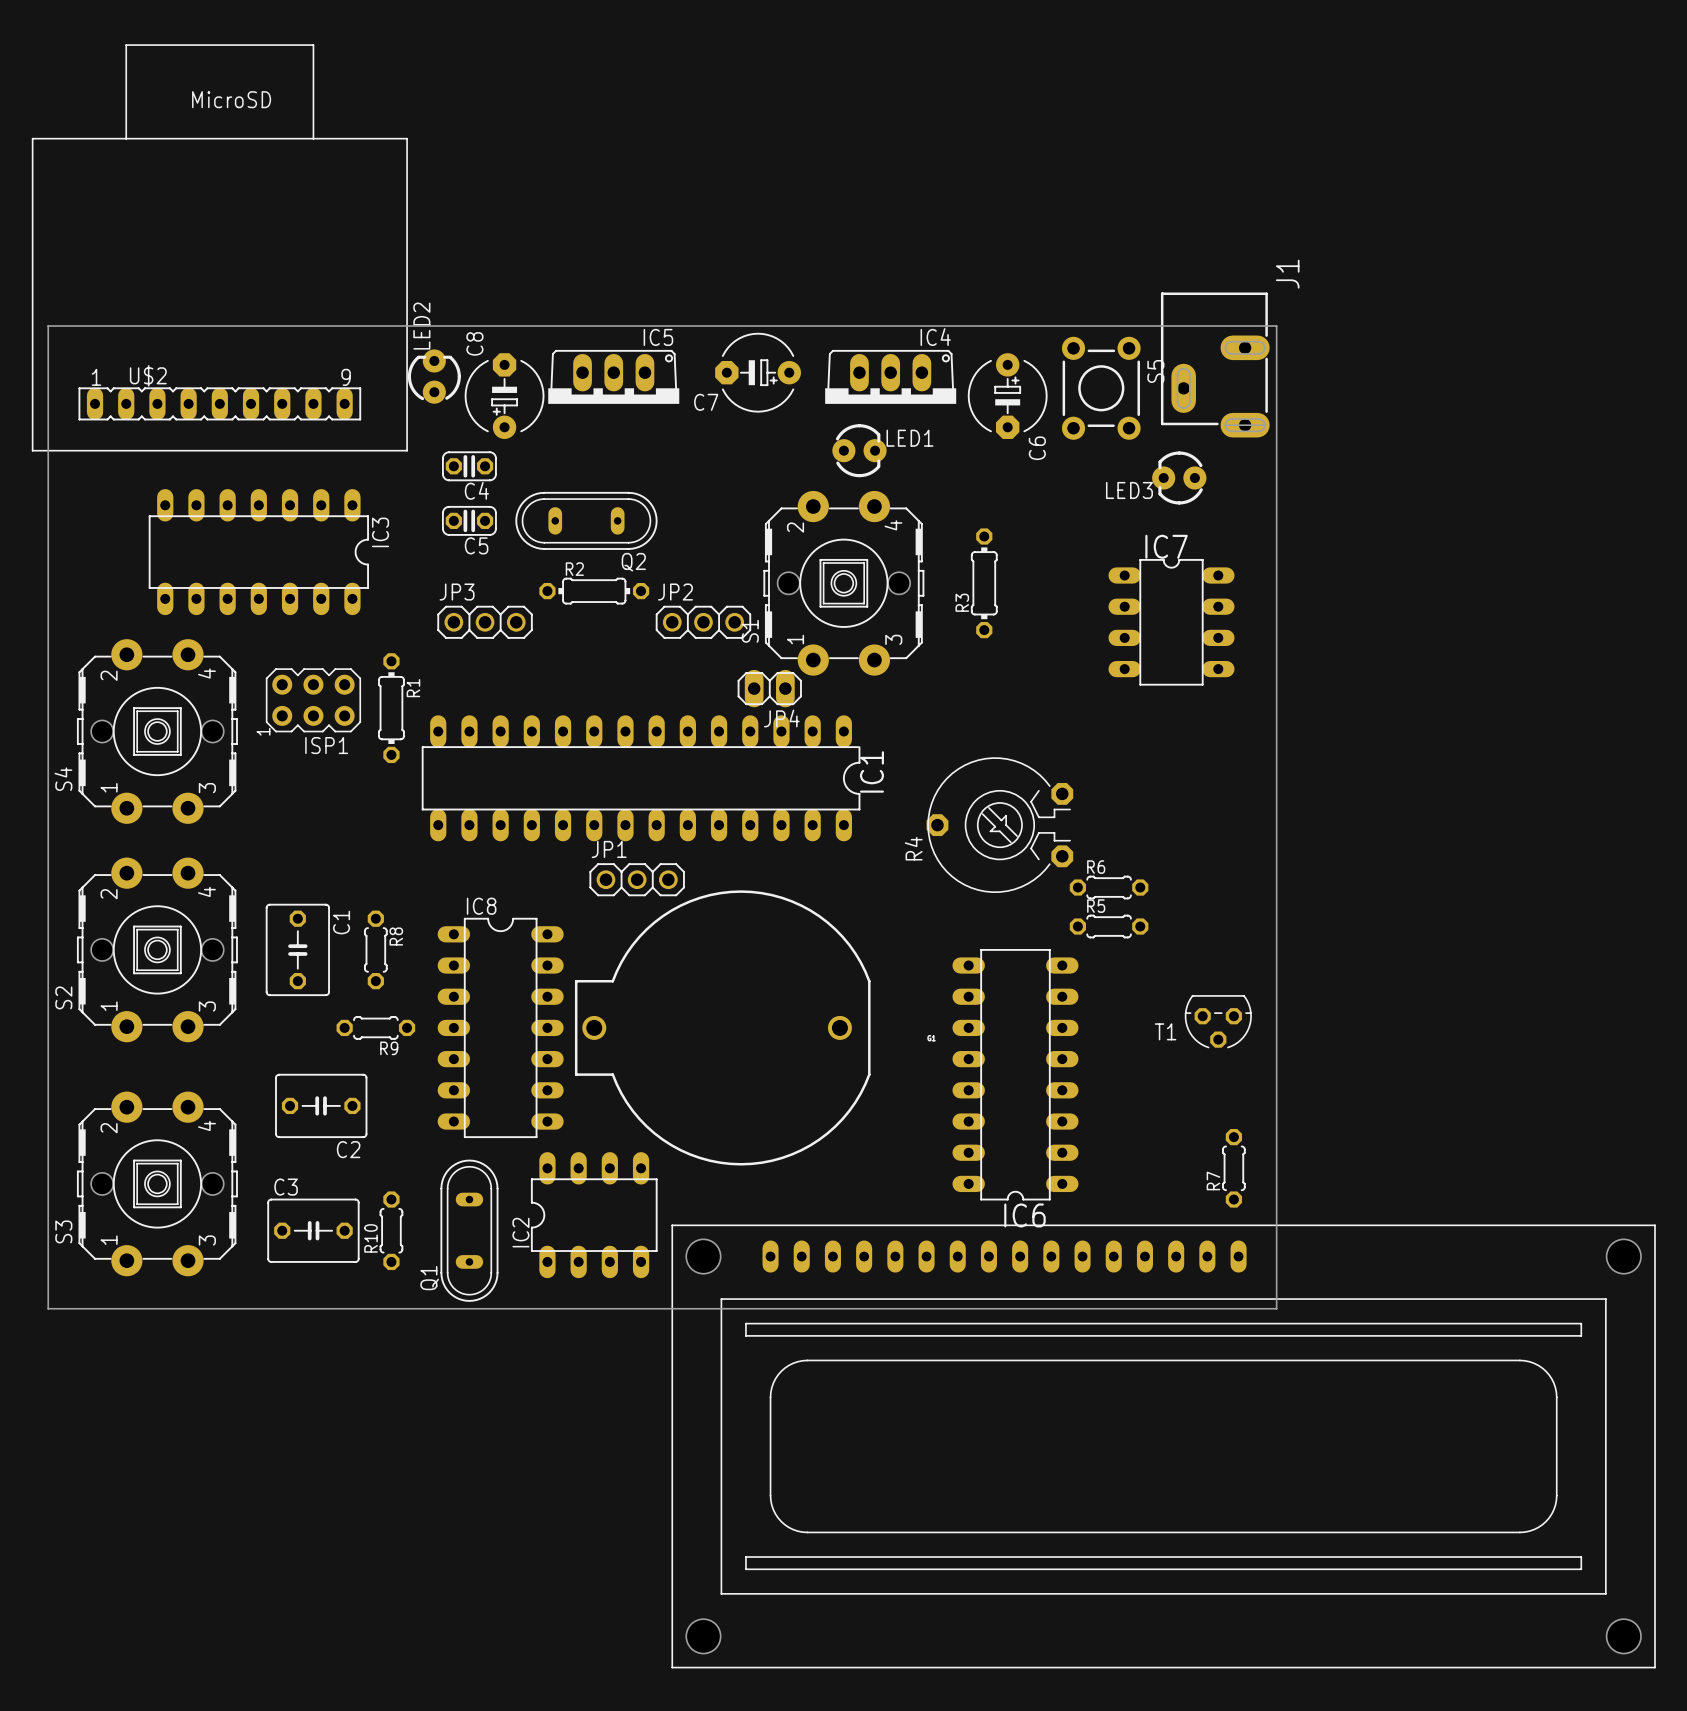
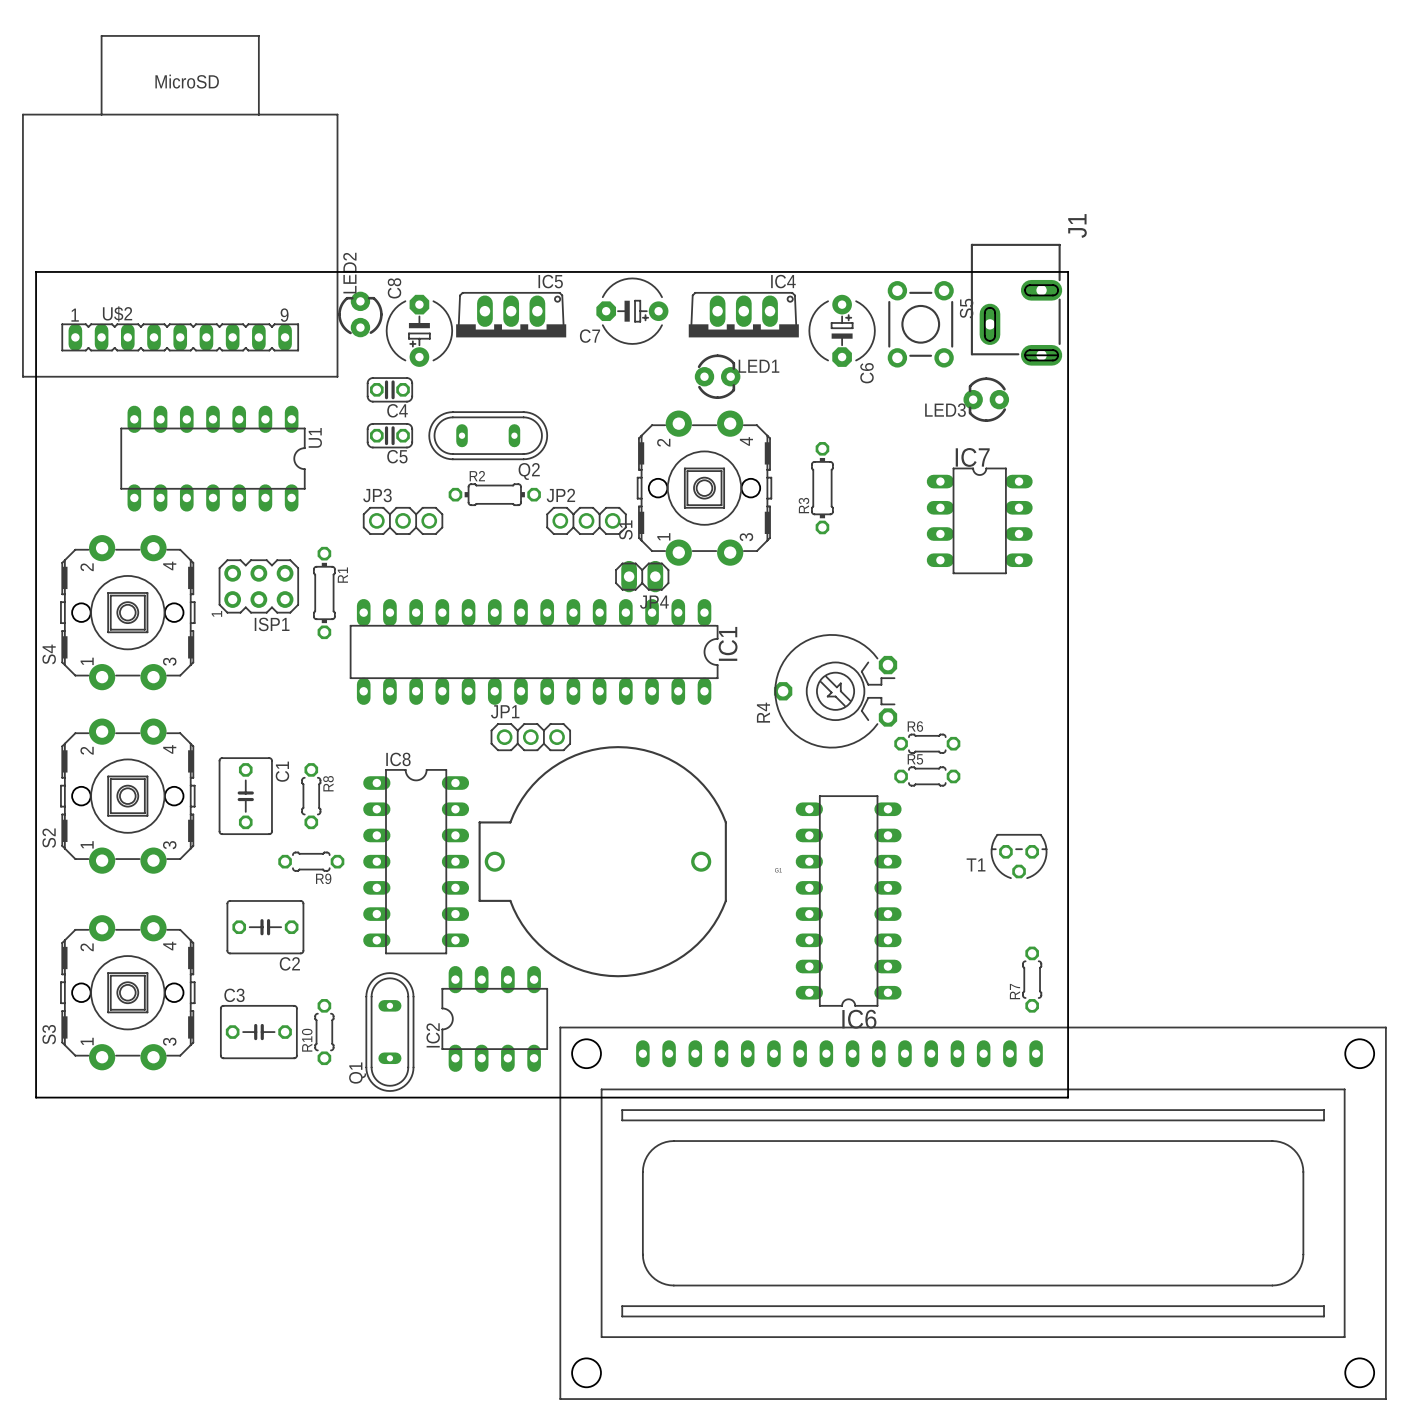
U1: none -> (212, 458)
IC3: (258, 552) -> none

